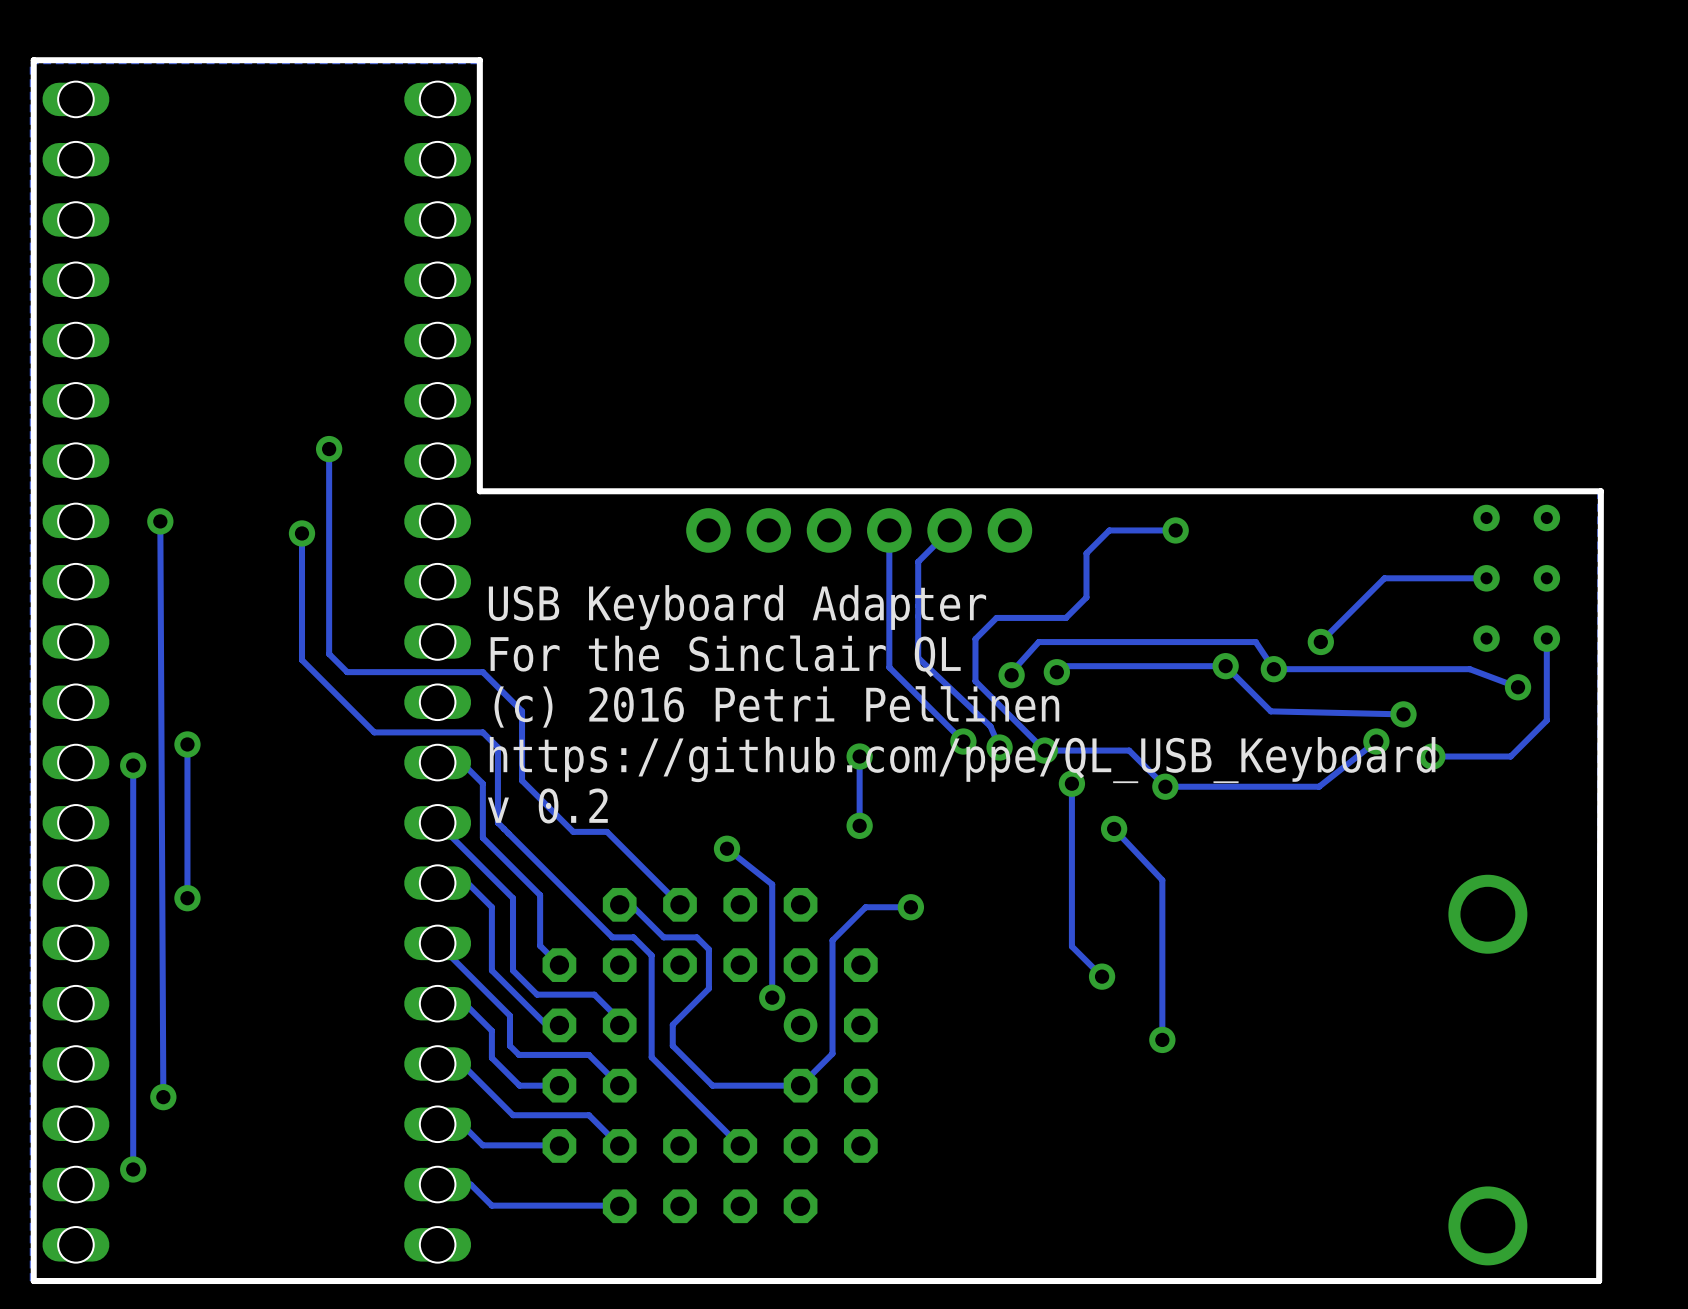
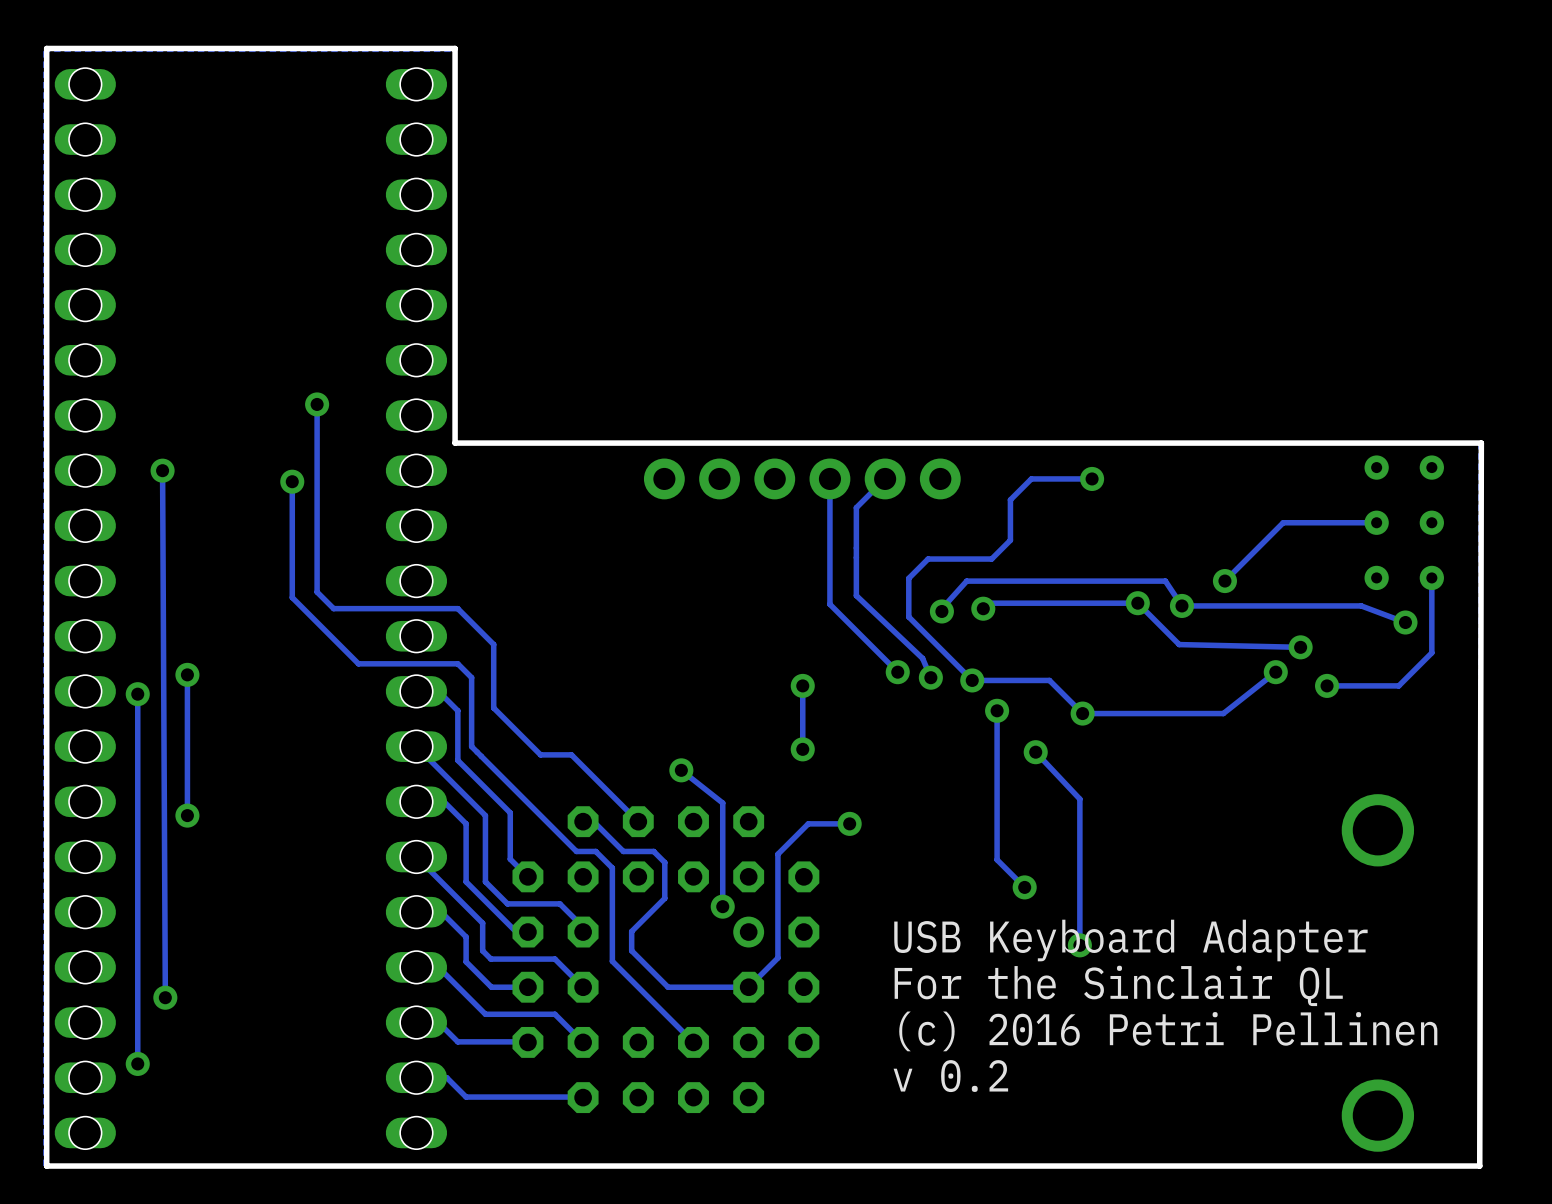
text: USB Keyboard Adapter (737, 607) -> none
text: For the Sinclair QL (725, 656) -> none
text: (c) 2016 Petri Pellinen (776, 706) -> none
text: https://github.com/ppe/QL_USB_Keyboard (962, 760) -> none
text: v 0.2 (547, 805) -> none
text: none -> USB Keyboard Adapter (1130, 940)
text: none -> For the Sinclair QL (1118, 985)
text: none -> (c) 2016 Petri Pellinen (1168, 1031)
text: none -> v 0.2 (950, 1076)

